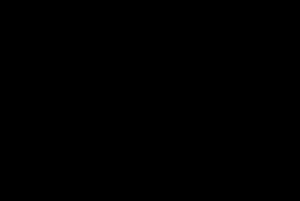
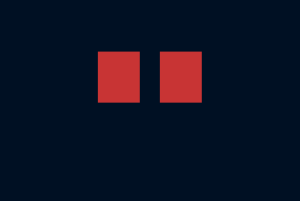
part: none -> (149, 77)

